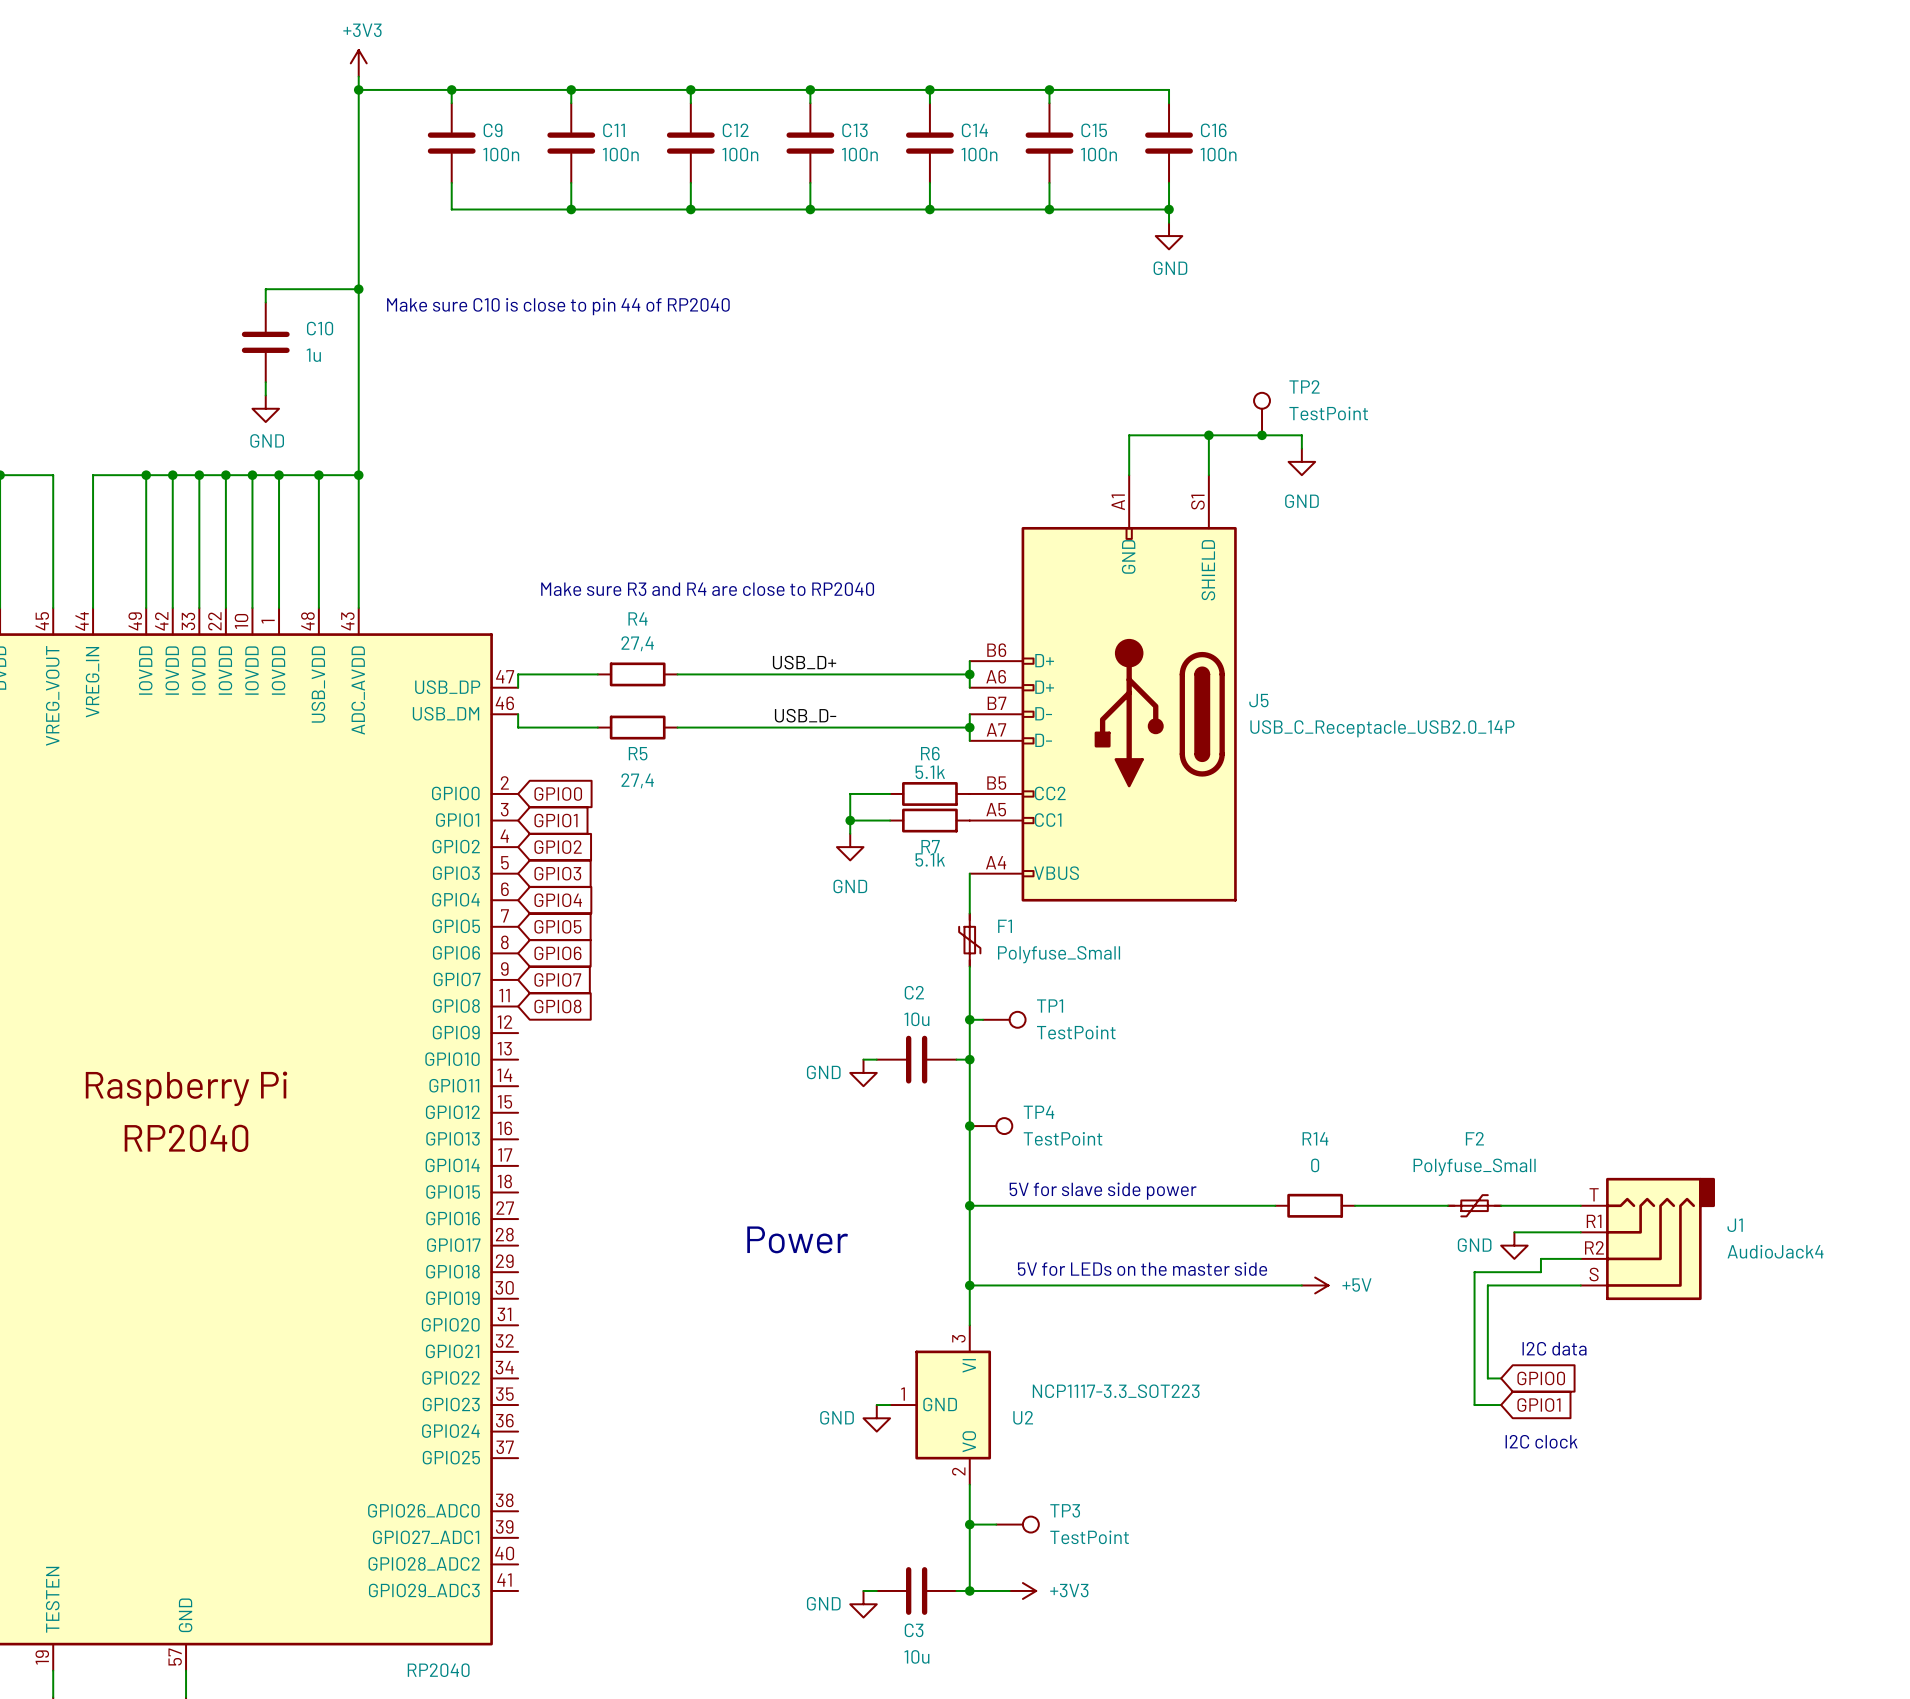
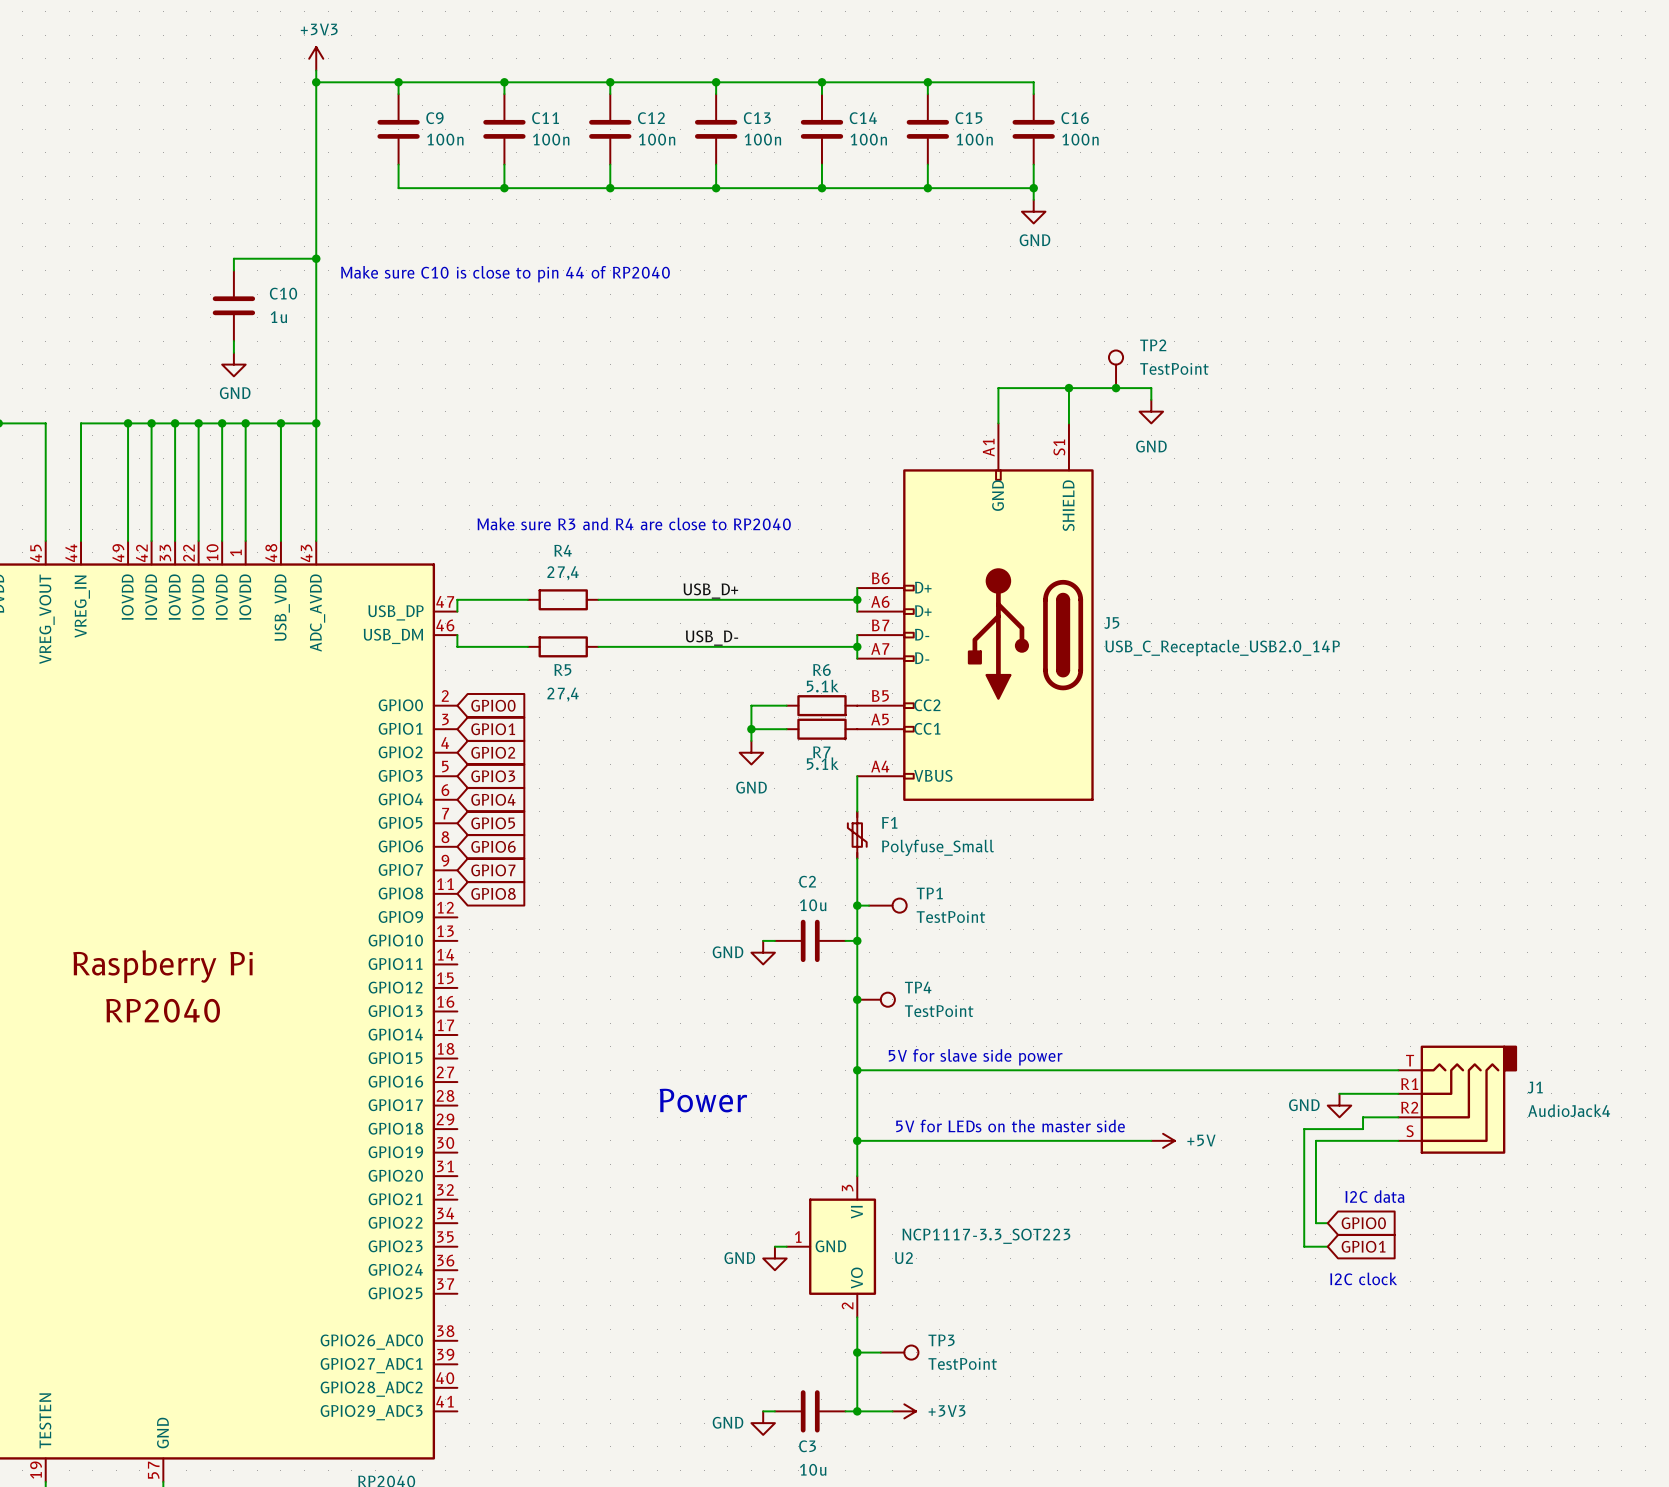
wire: none -> (1127, 1070) (1198, 1070)
R14: 0 (1315, 1205) -> none
F2: Polyfuse_Small (1474, 1205) -> none

